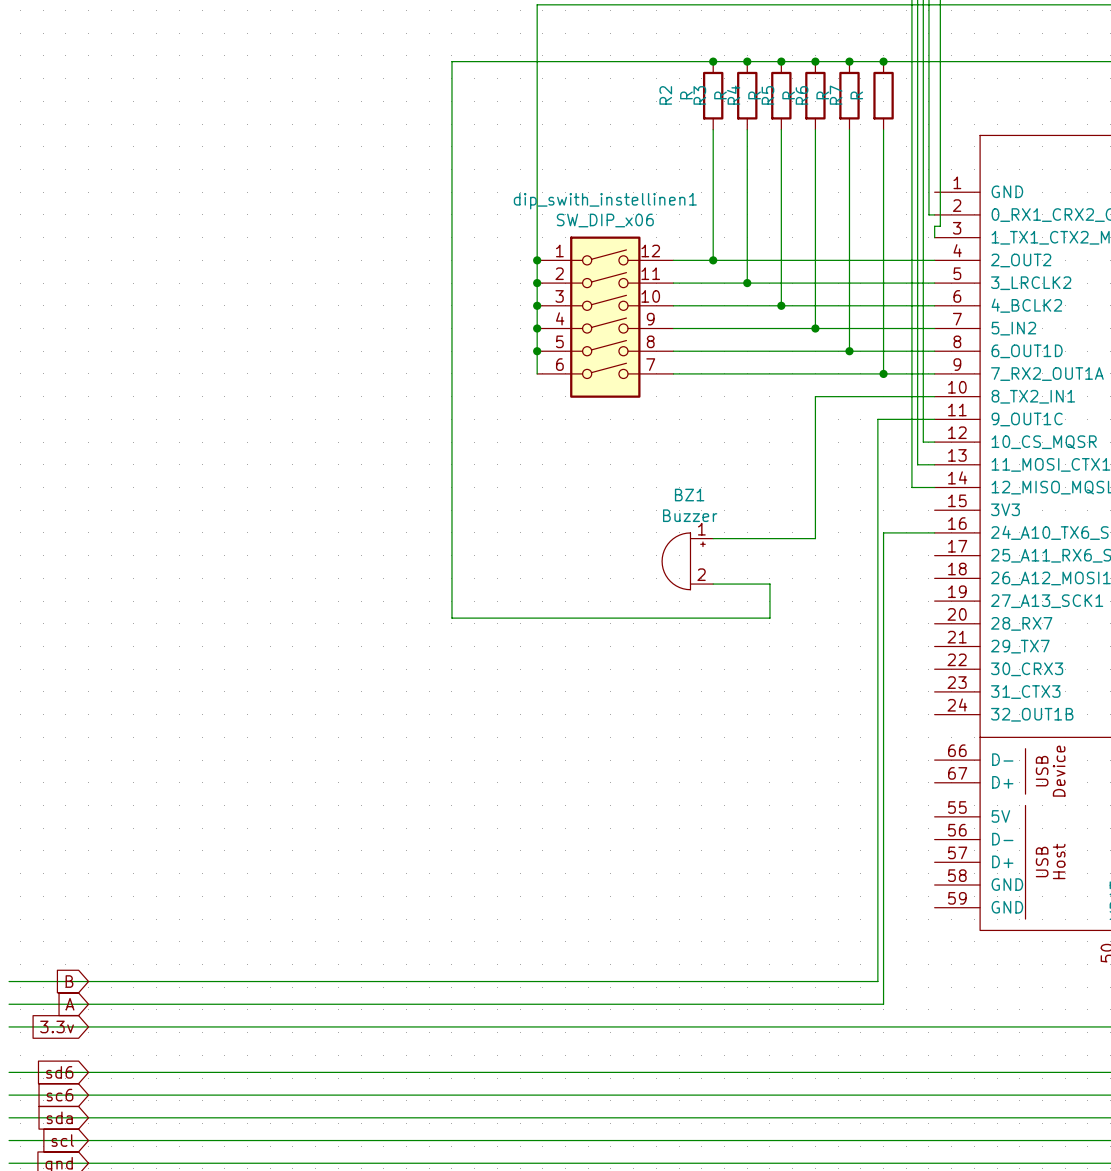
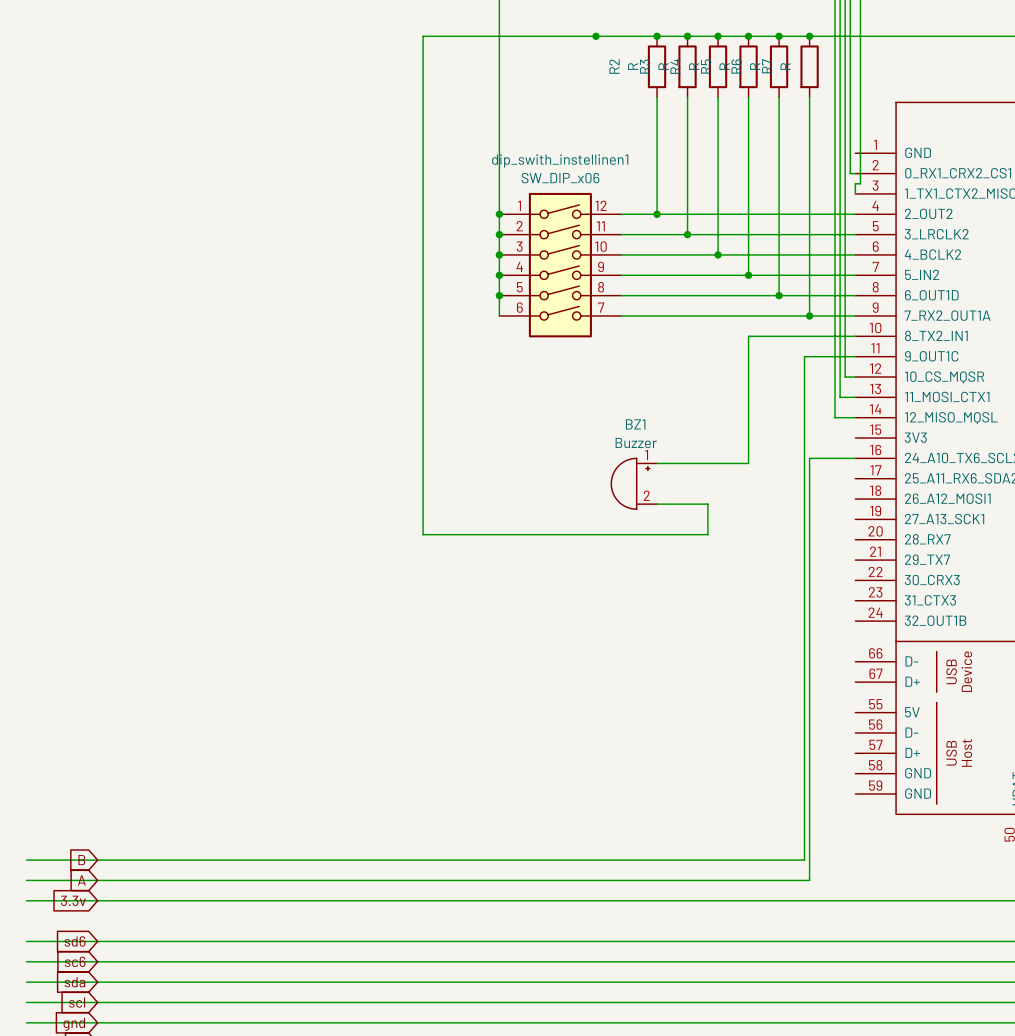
junction: none -> (596, 36)

